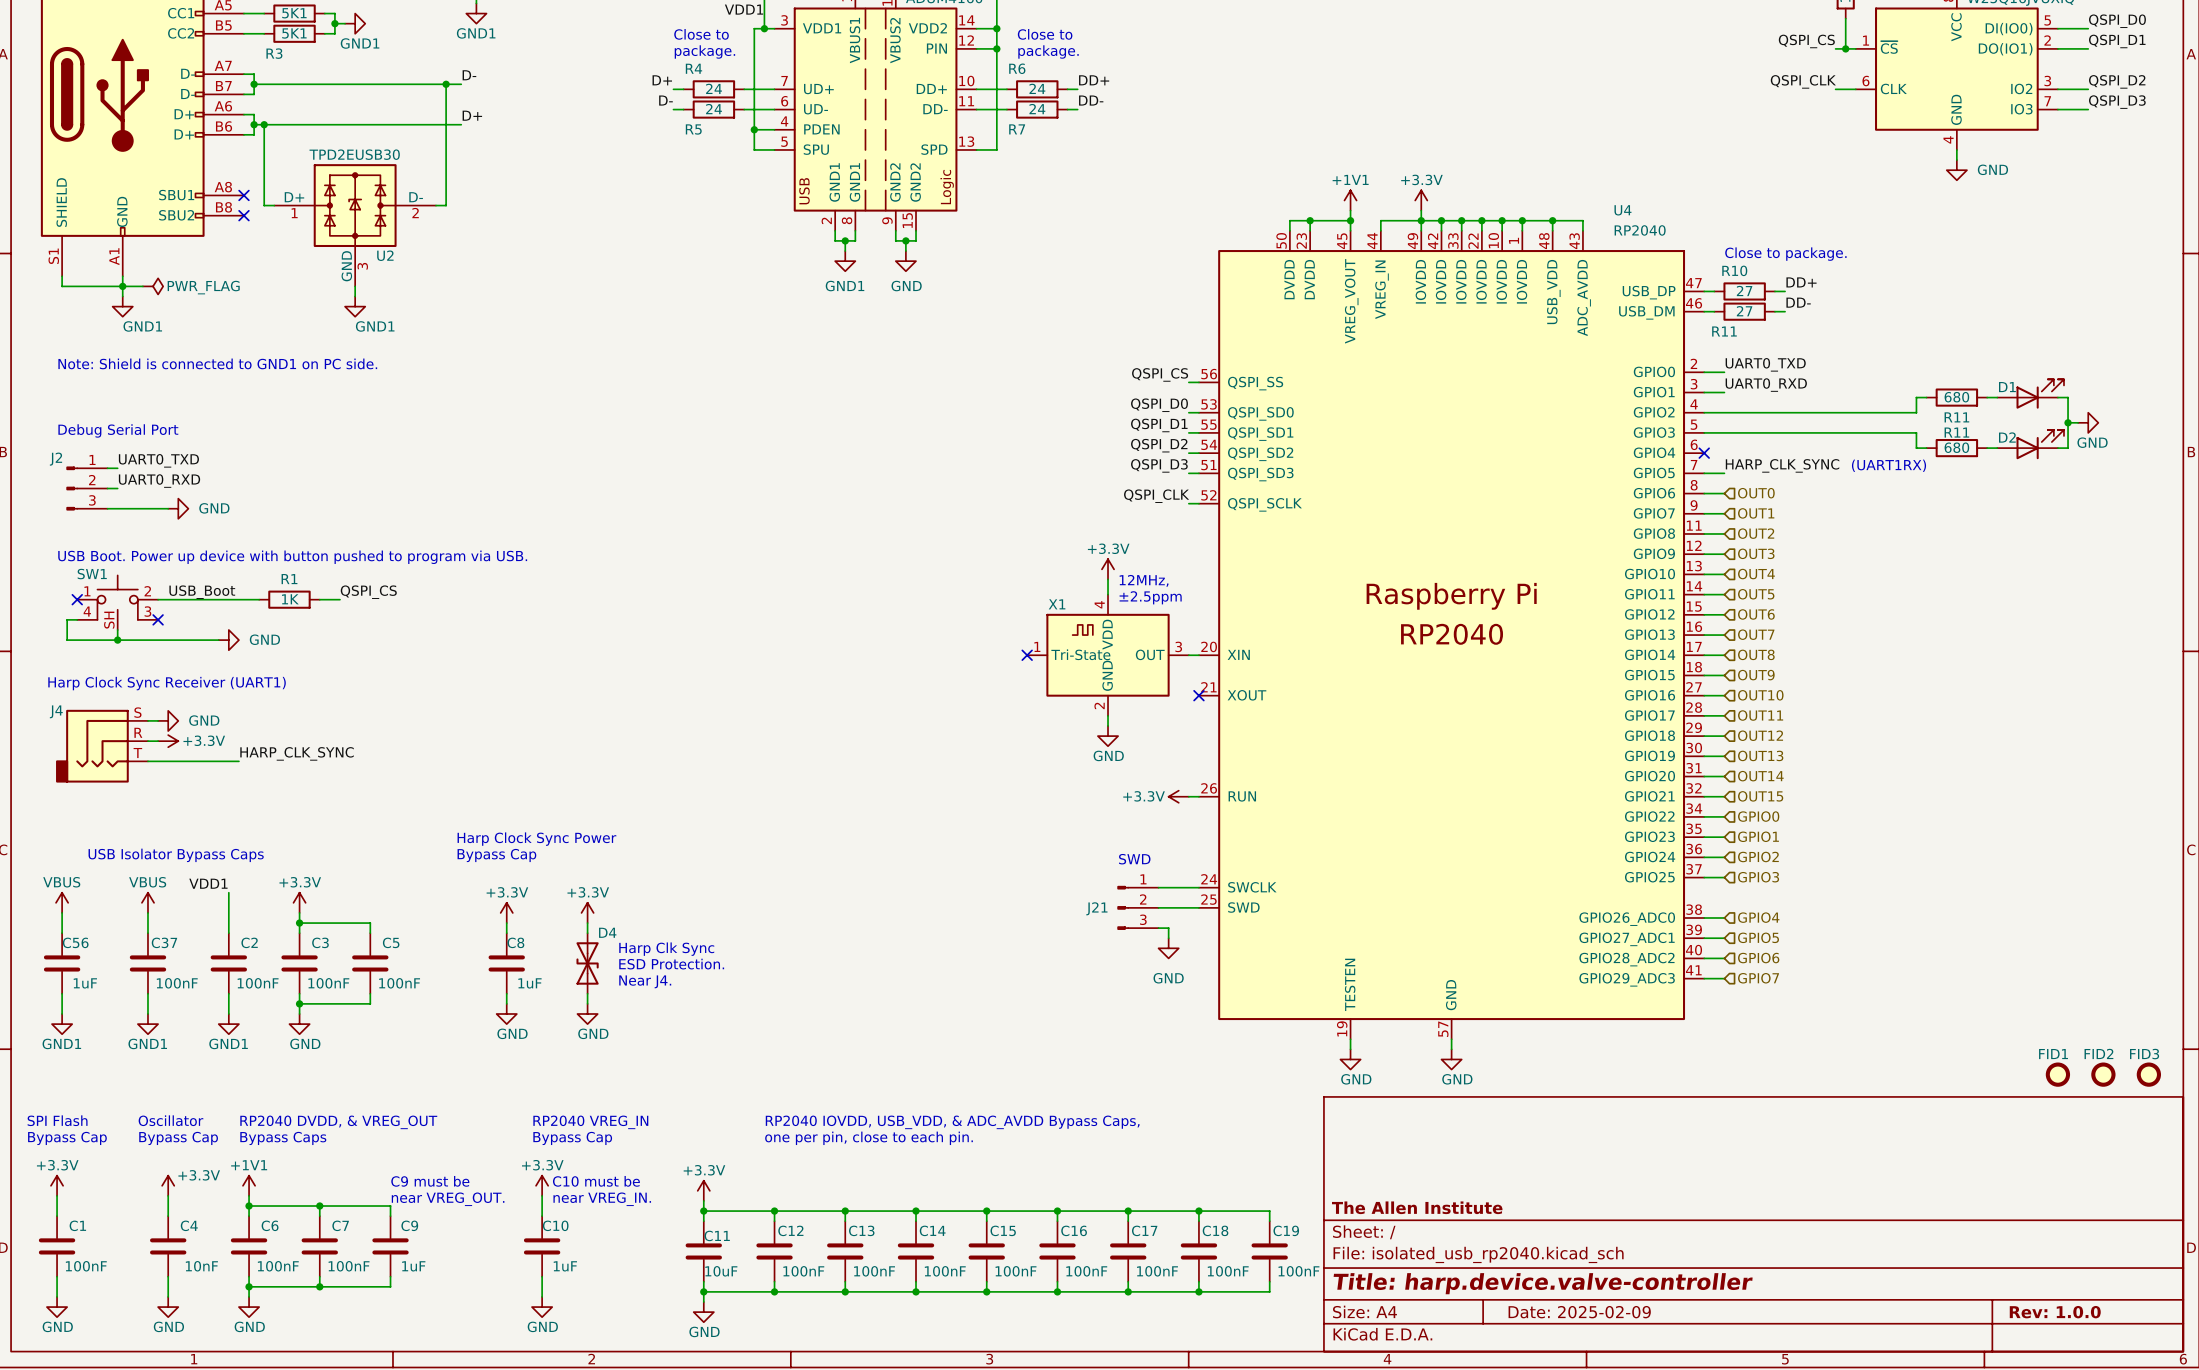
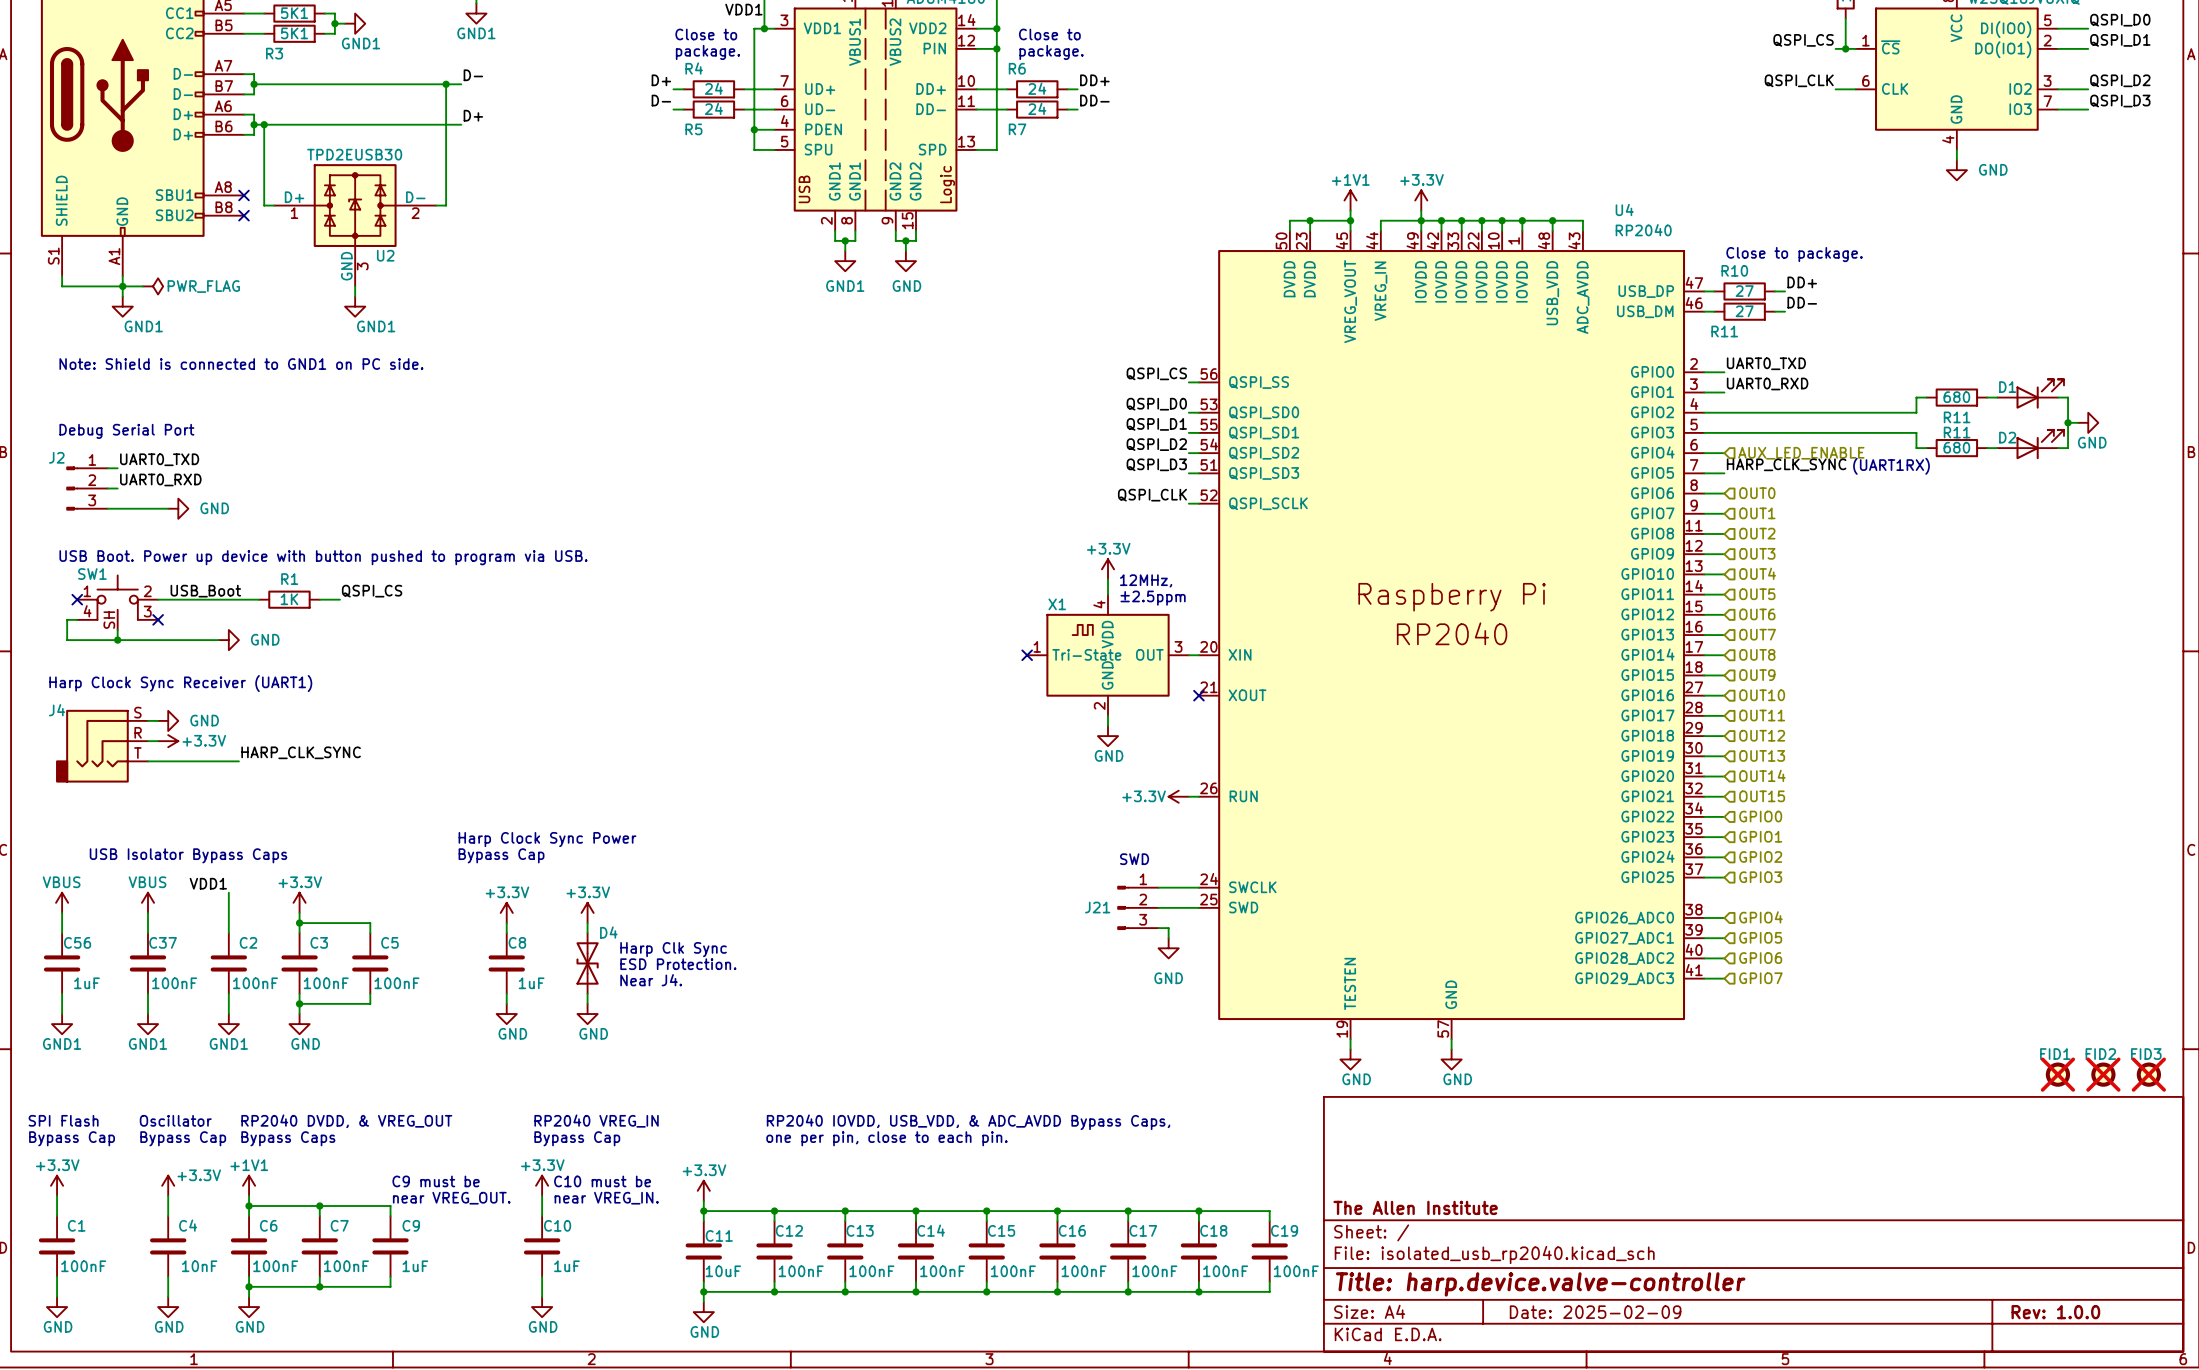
wire: none -> (1704, 453) (1724, 453)
no-connect mark: (1704, 453) -> none
hierarchical label: none -> AUX_LED_ENABLE (1801, 453)
FID1 do-not-place cross: none -> (2057, 1074)
FID2 do-not-place cross: none -> (2103, 1074)
FID3 do-not-place cross: none -> (2148, 1074)

